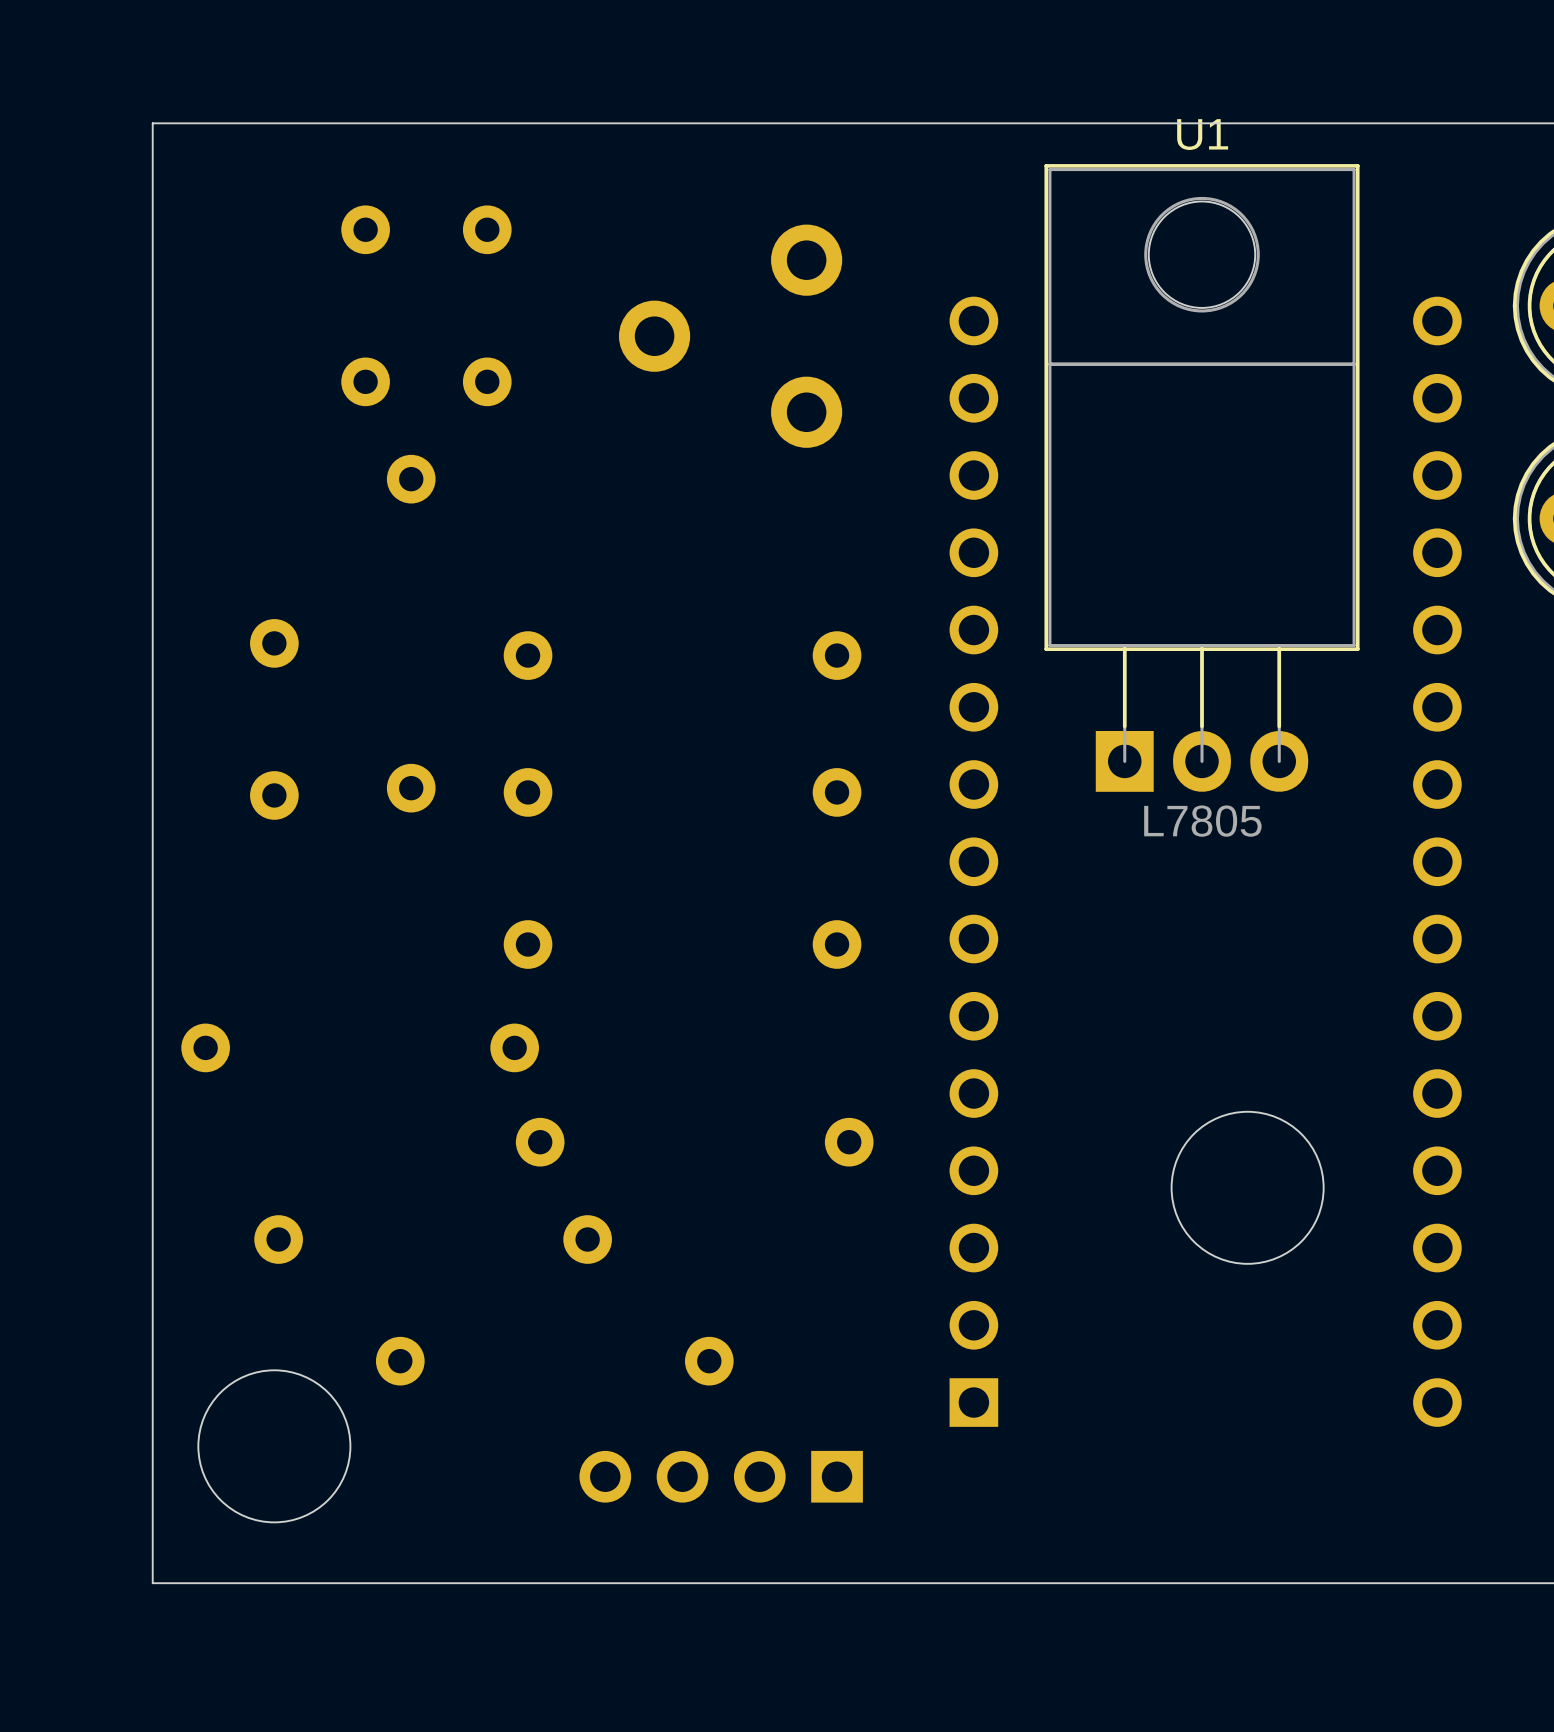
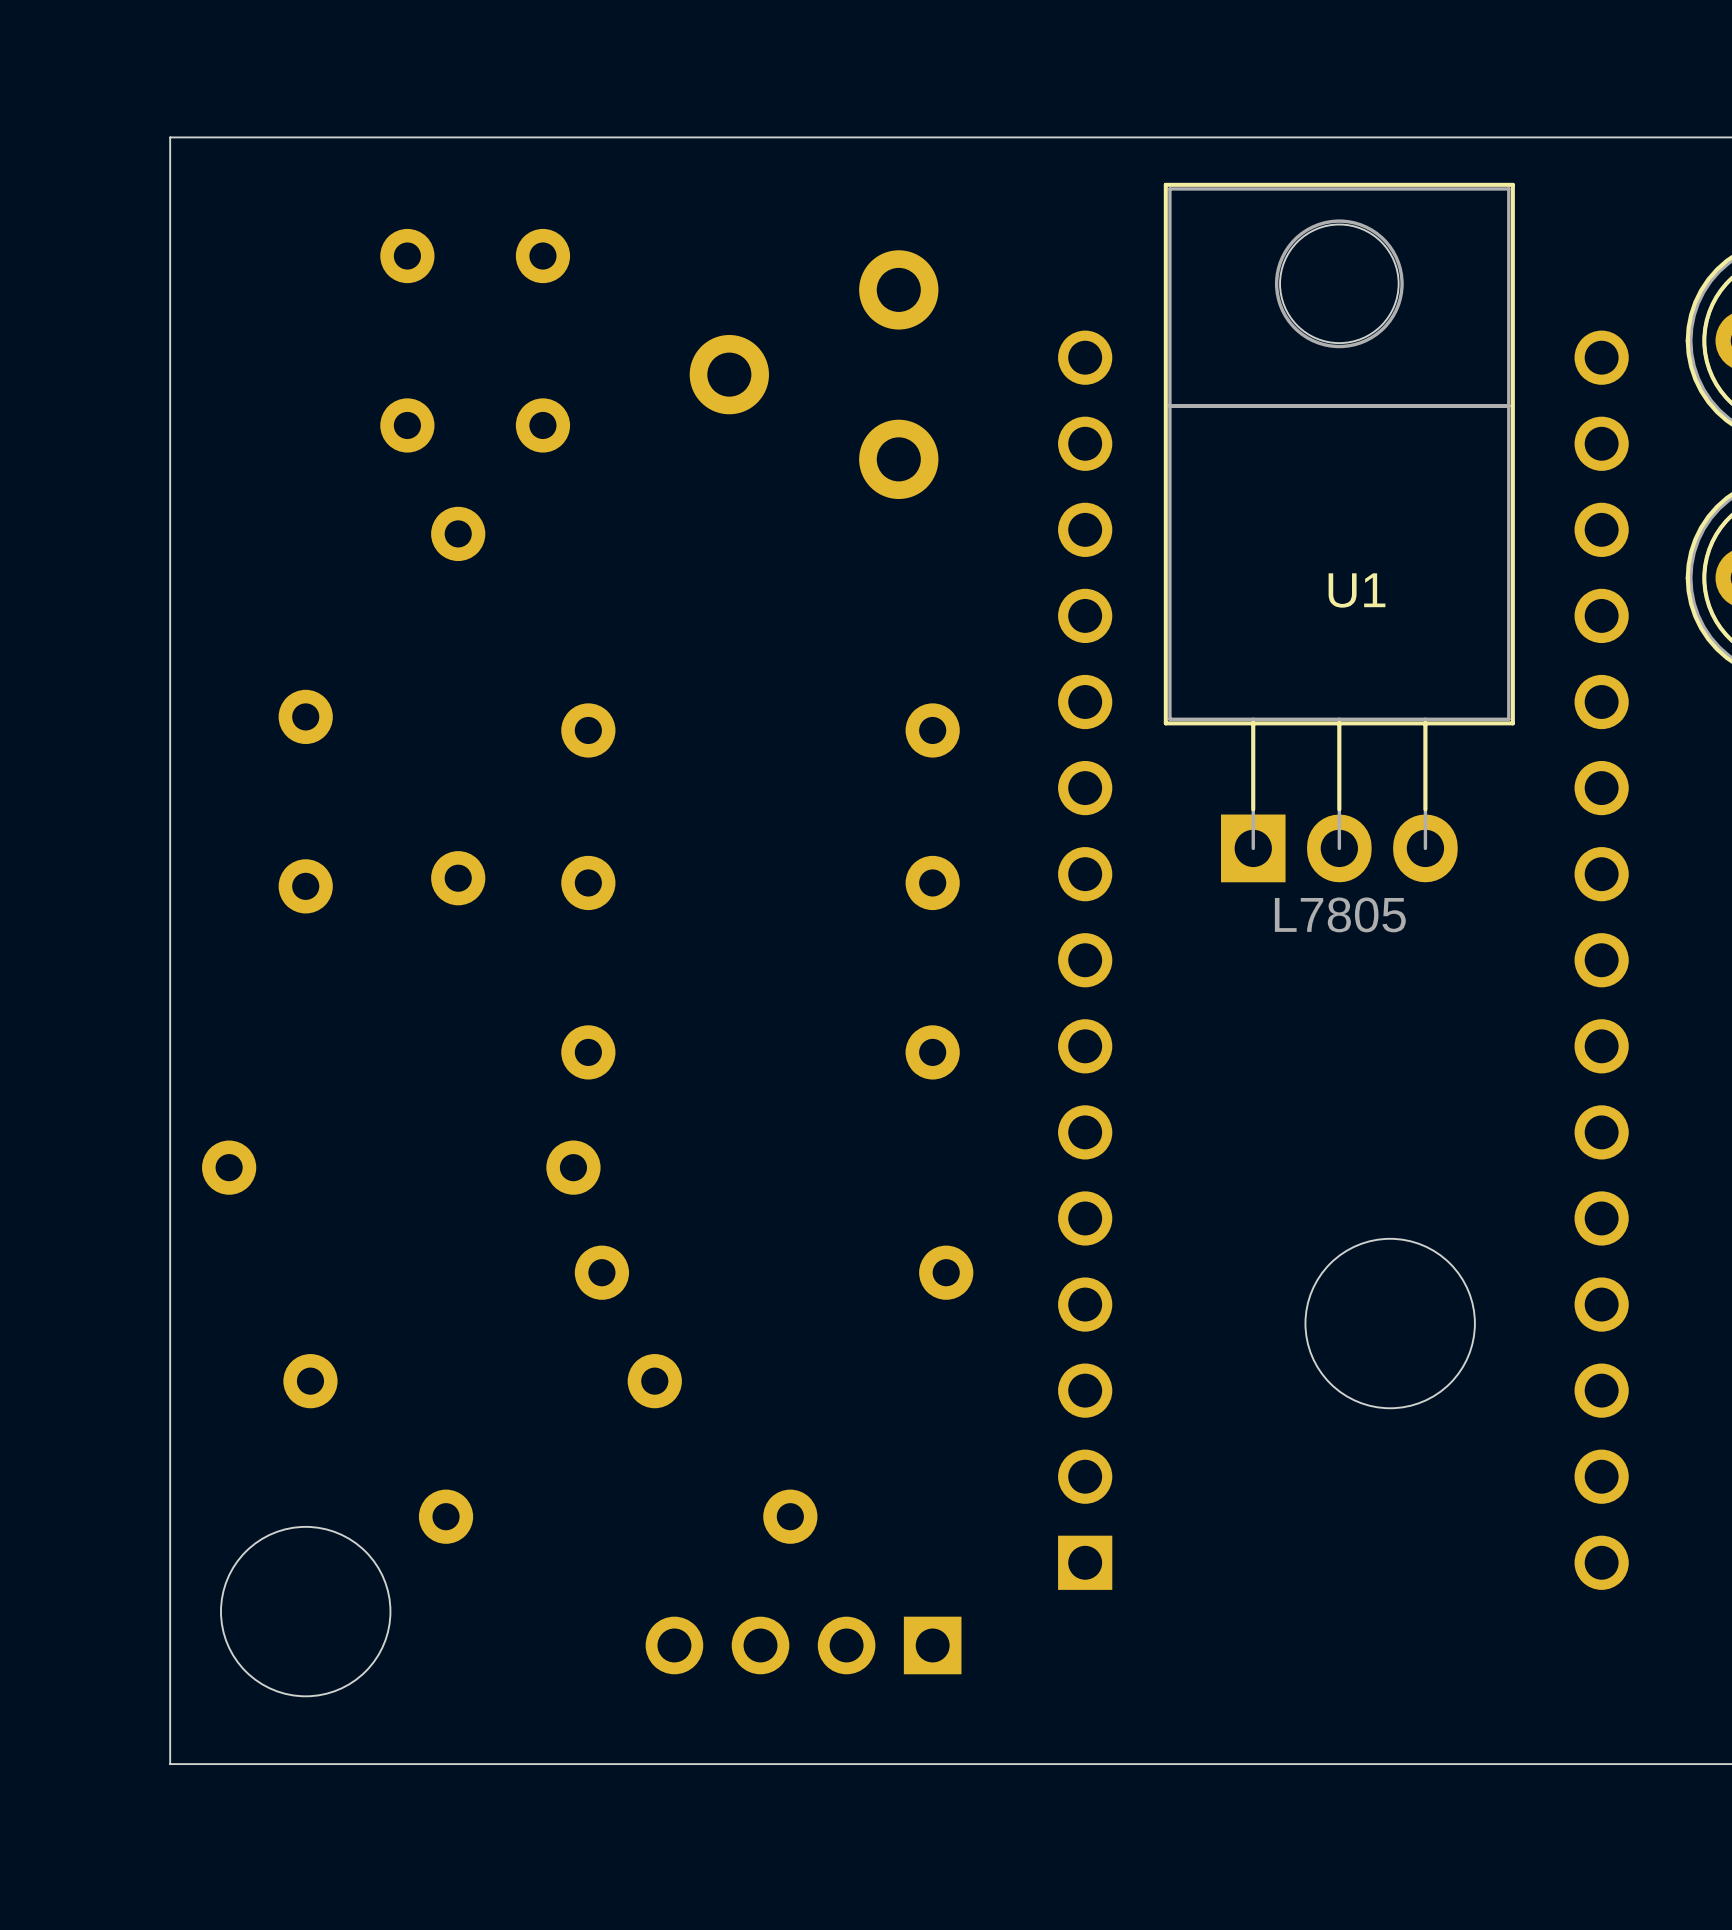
U1 name position: U1 (1202, 134) -> U1 (1356, 590)

